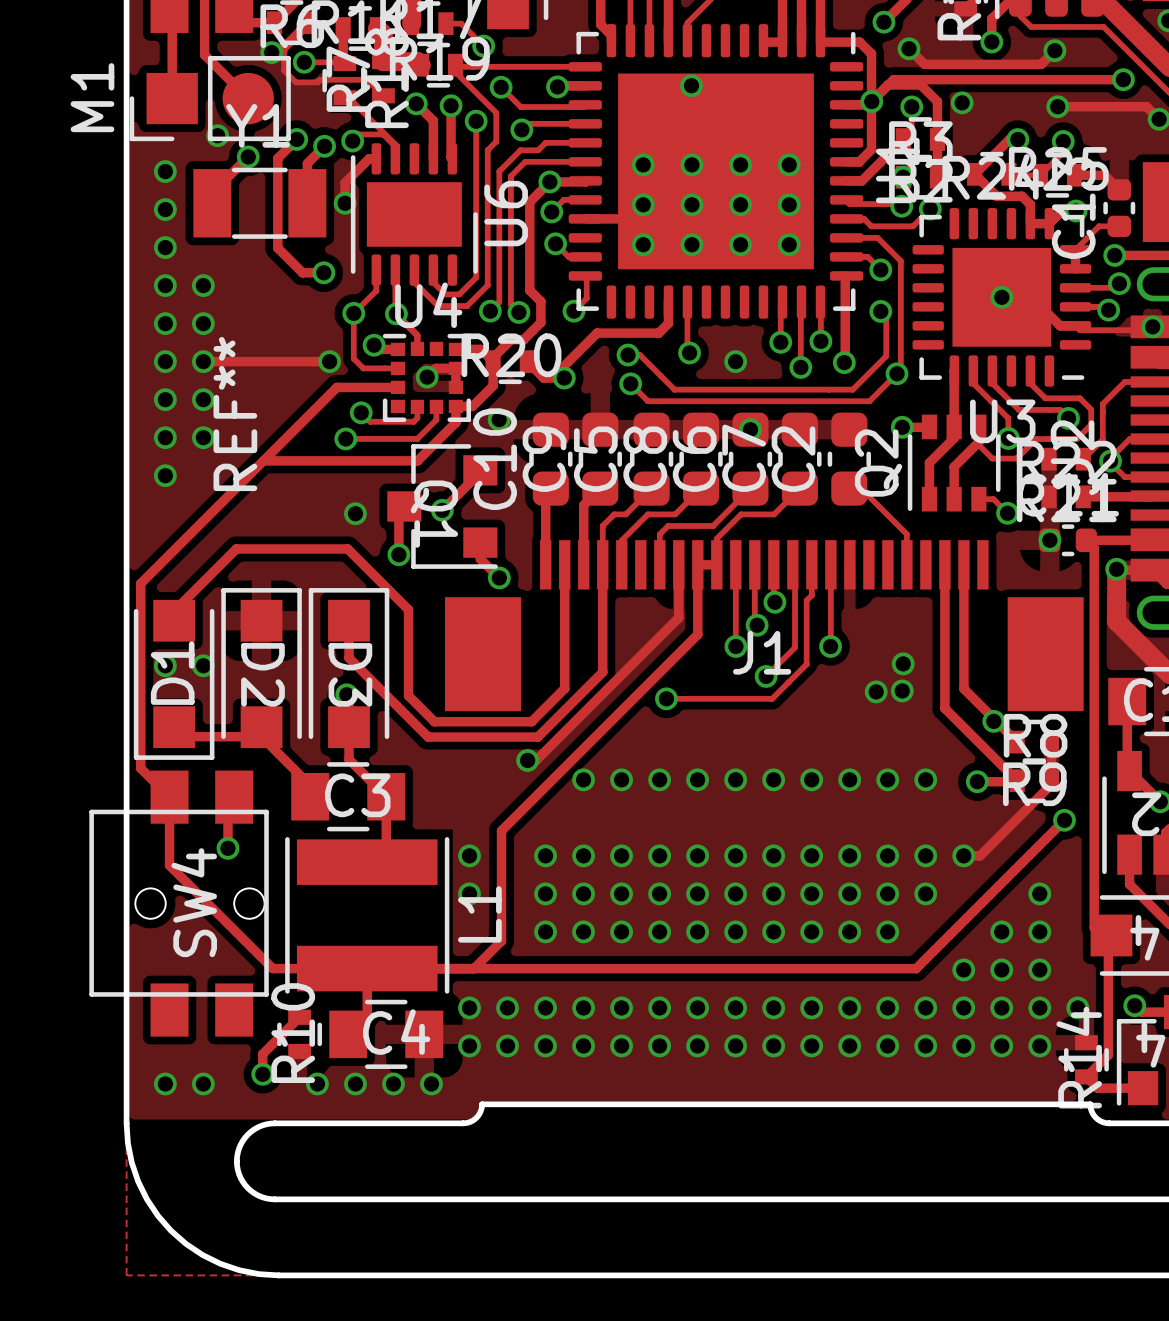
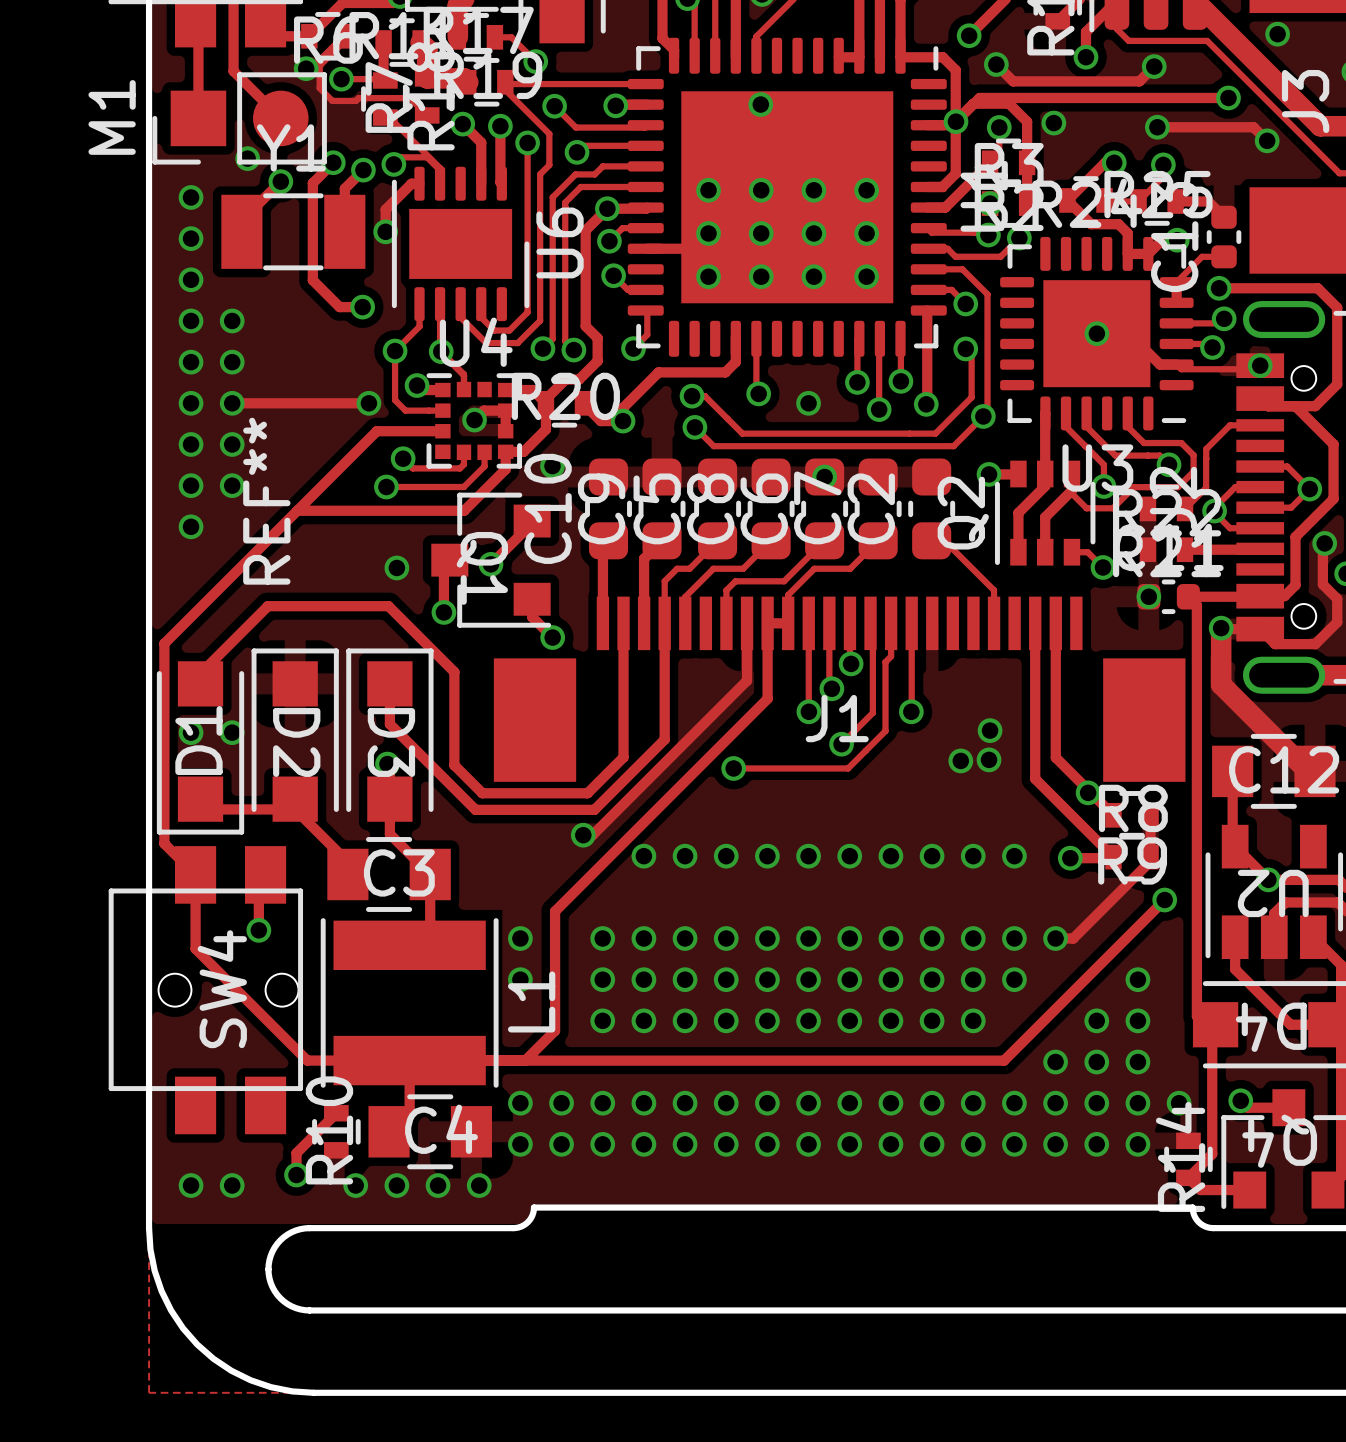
REF** position: (235, 414) -> (266, 501)

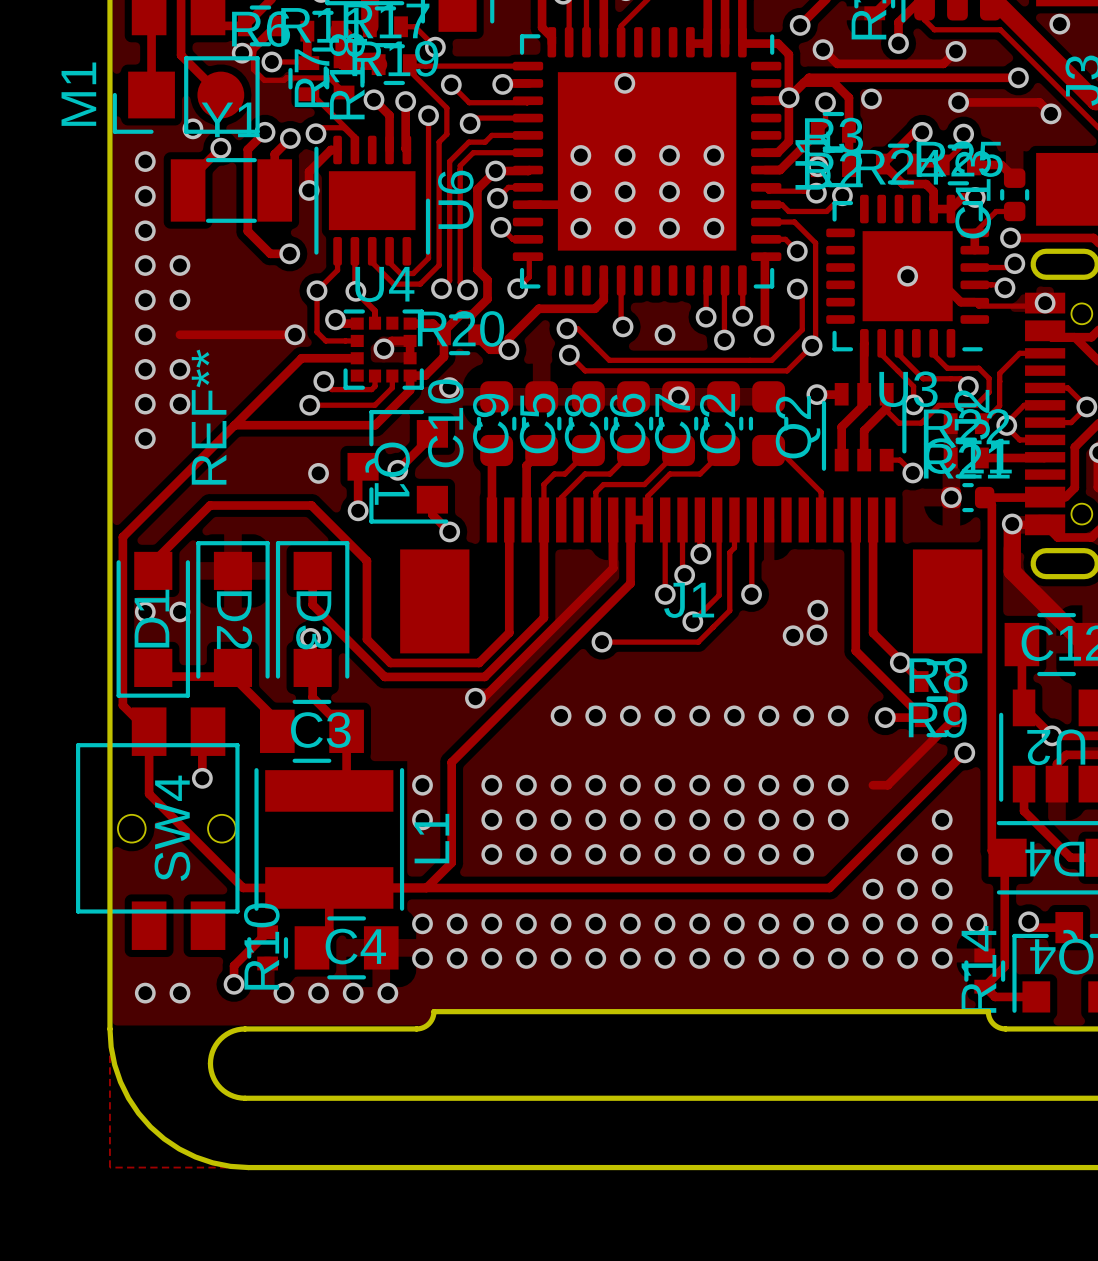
via: (232, 403) -> none
via: (643, 856) -> none
via: (1055, 938) -> none

